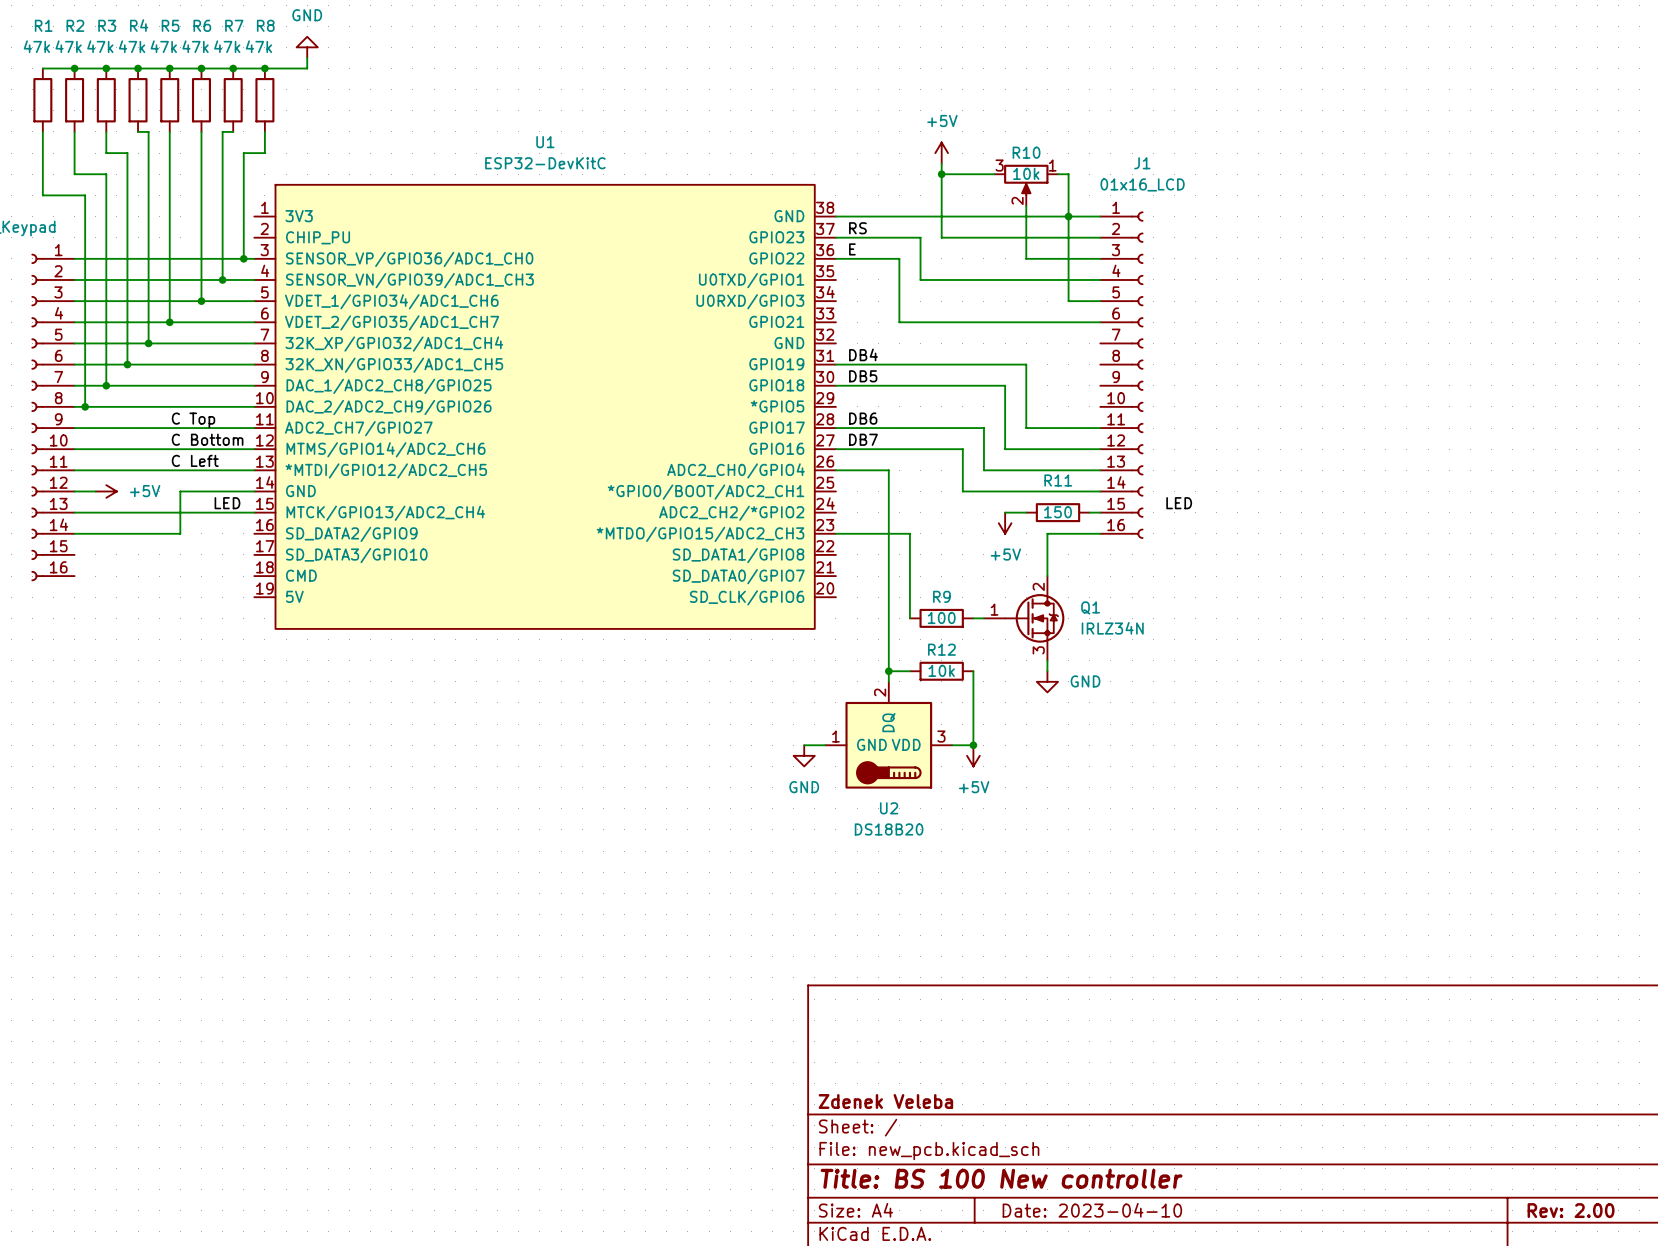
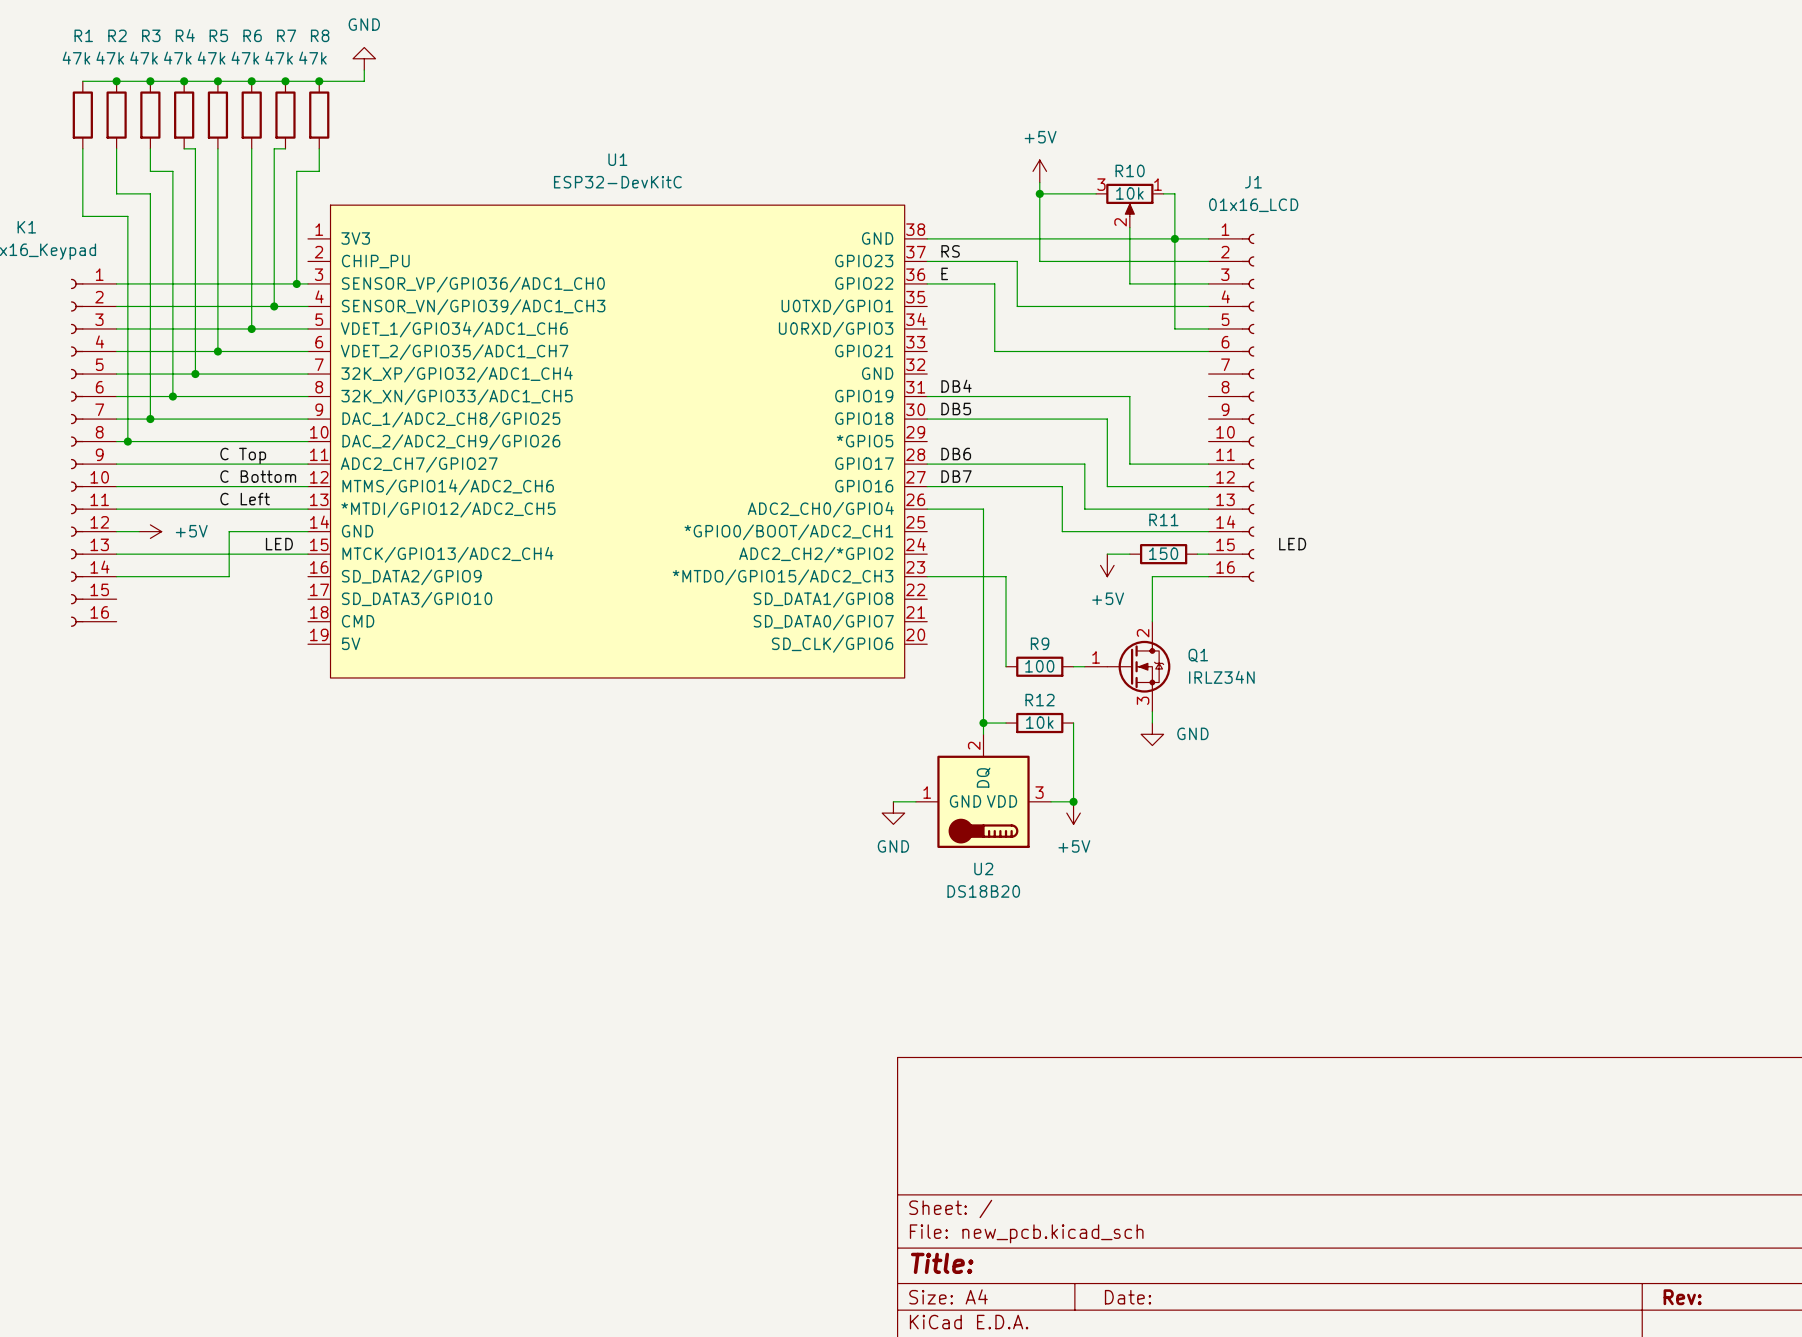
title block: Zdenek Veleba (885, 1101) -> none
title block: Title: BS 100 New controller (1001, 1178) -> Title: (942, 1263)
title block: Date: 2023-04-10 (1092, 1210) -> Date: (1128, 1297)
title block: Rev: 2.00 (1571, 1210) -> Rev: (1682, 1297)

